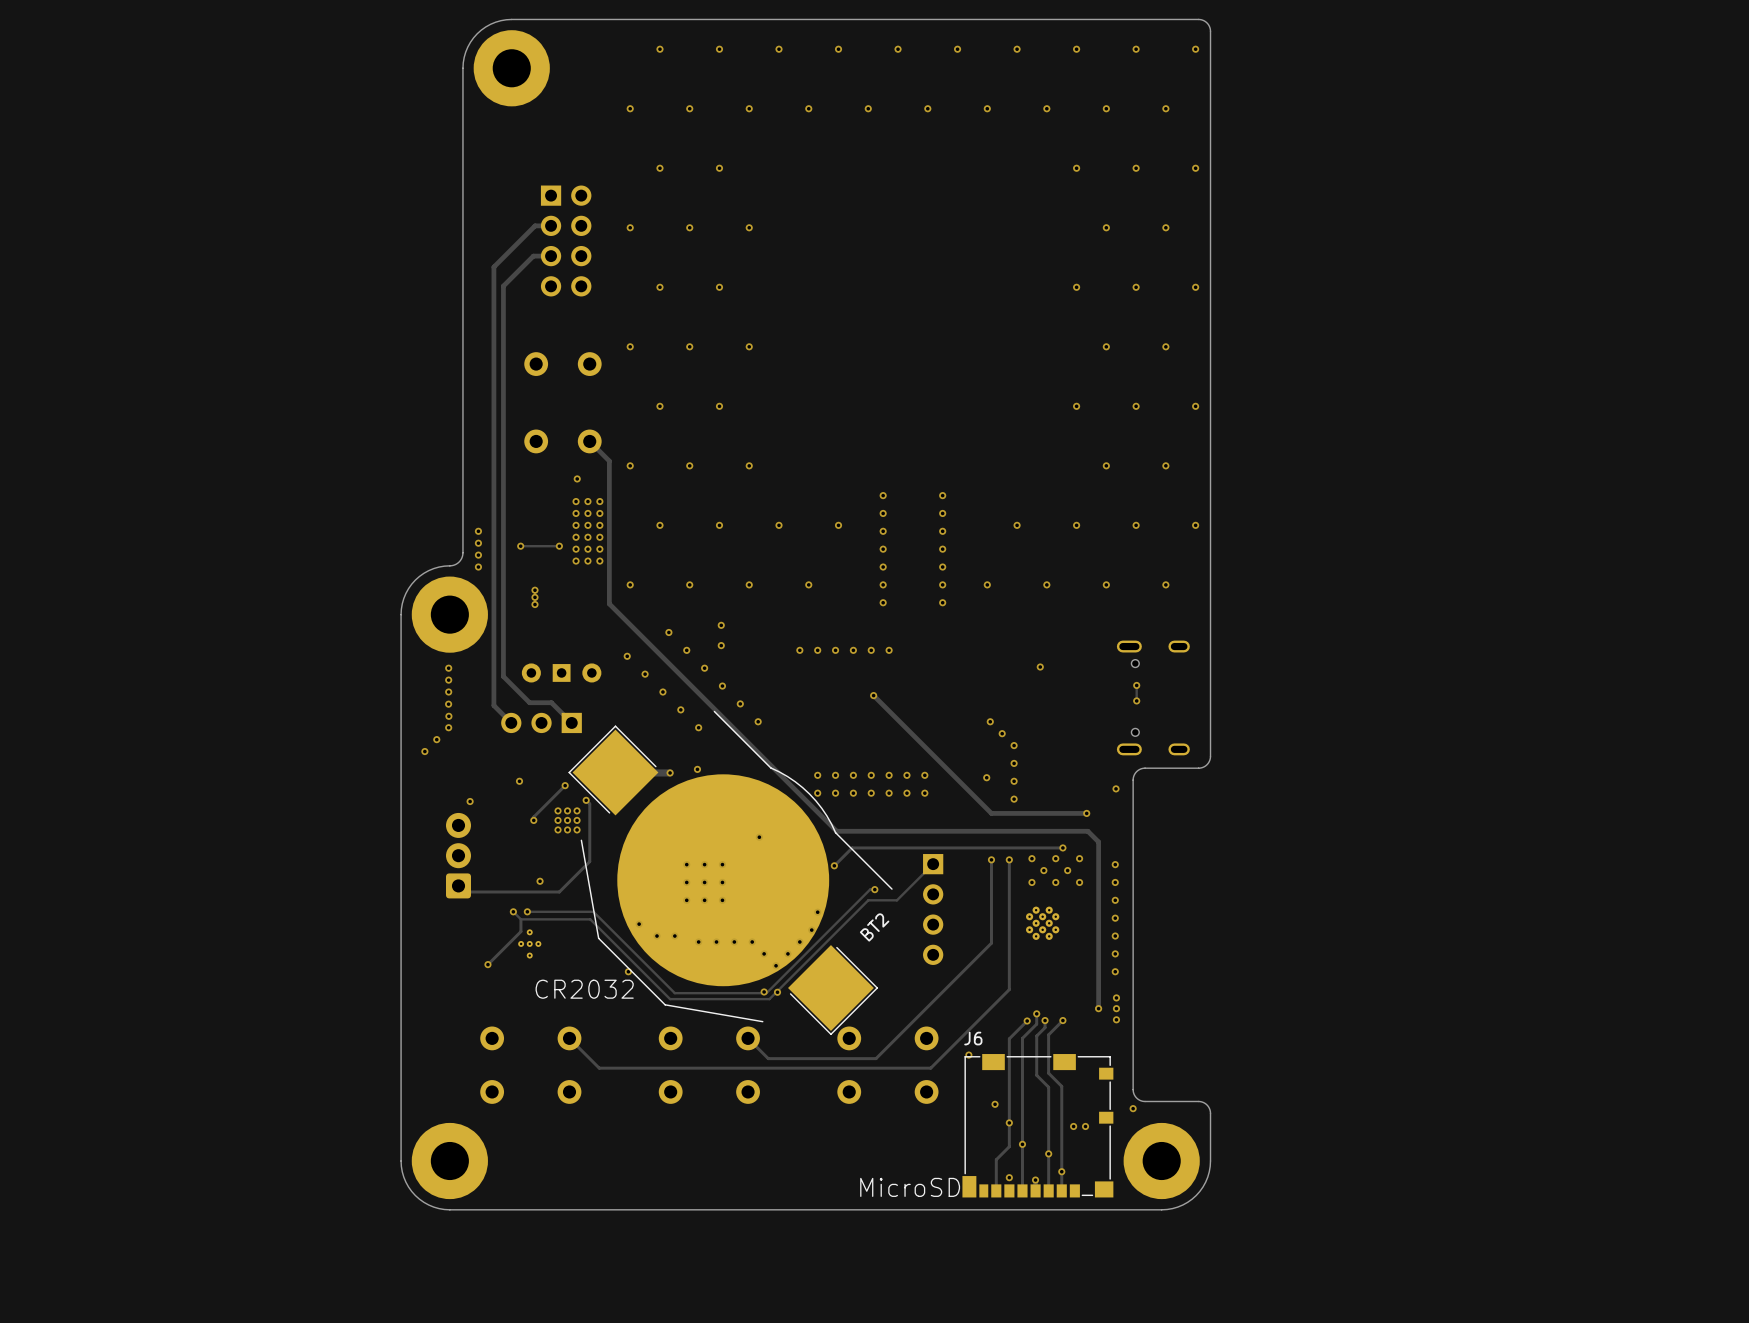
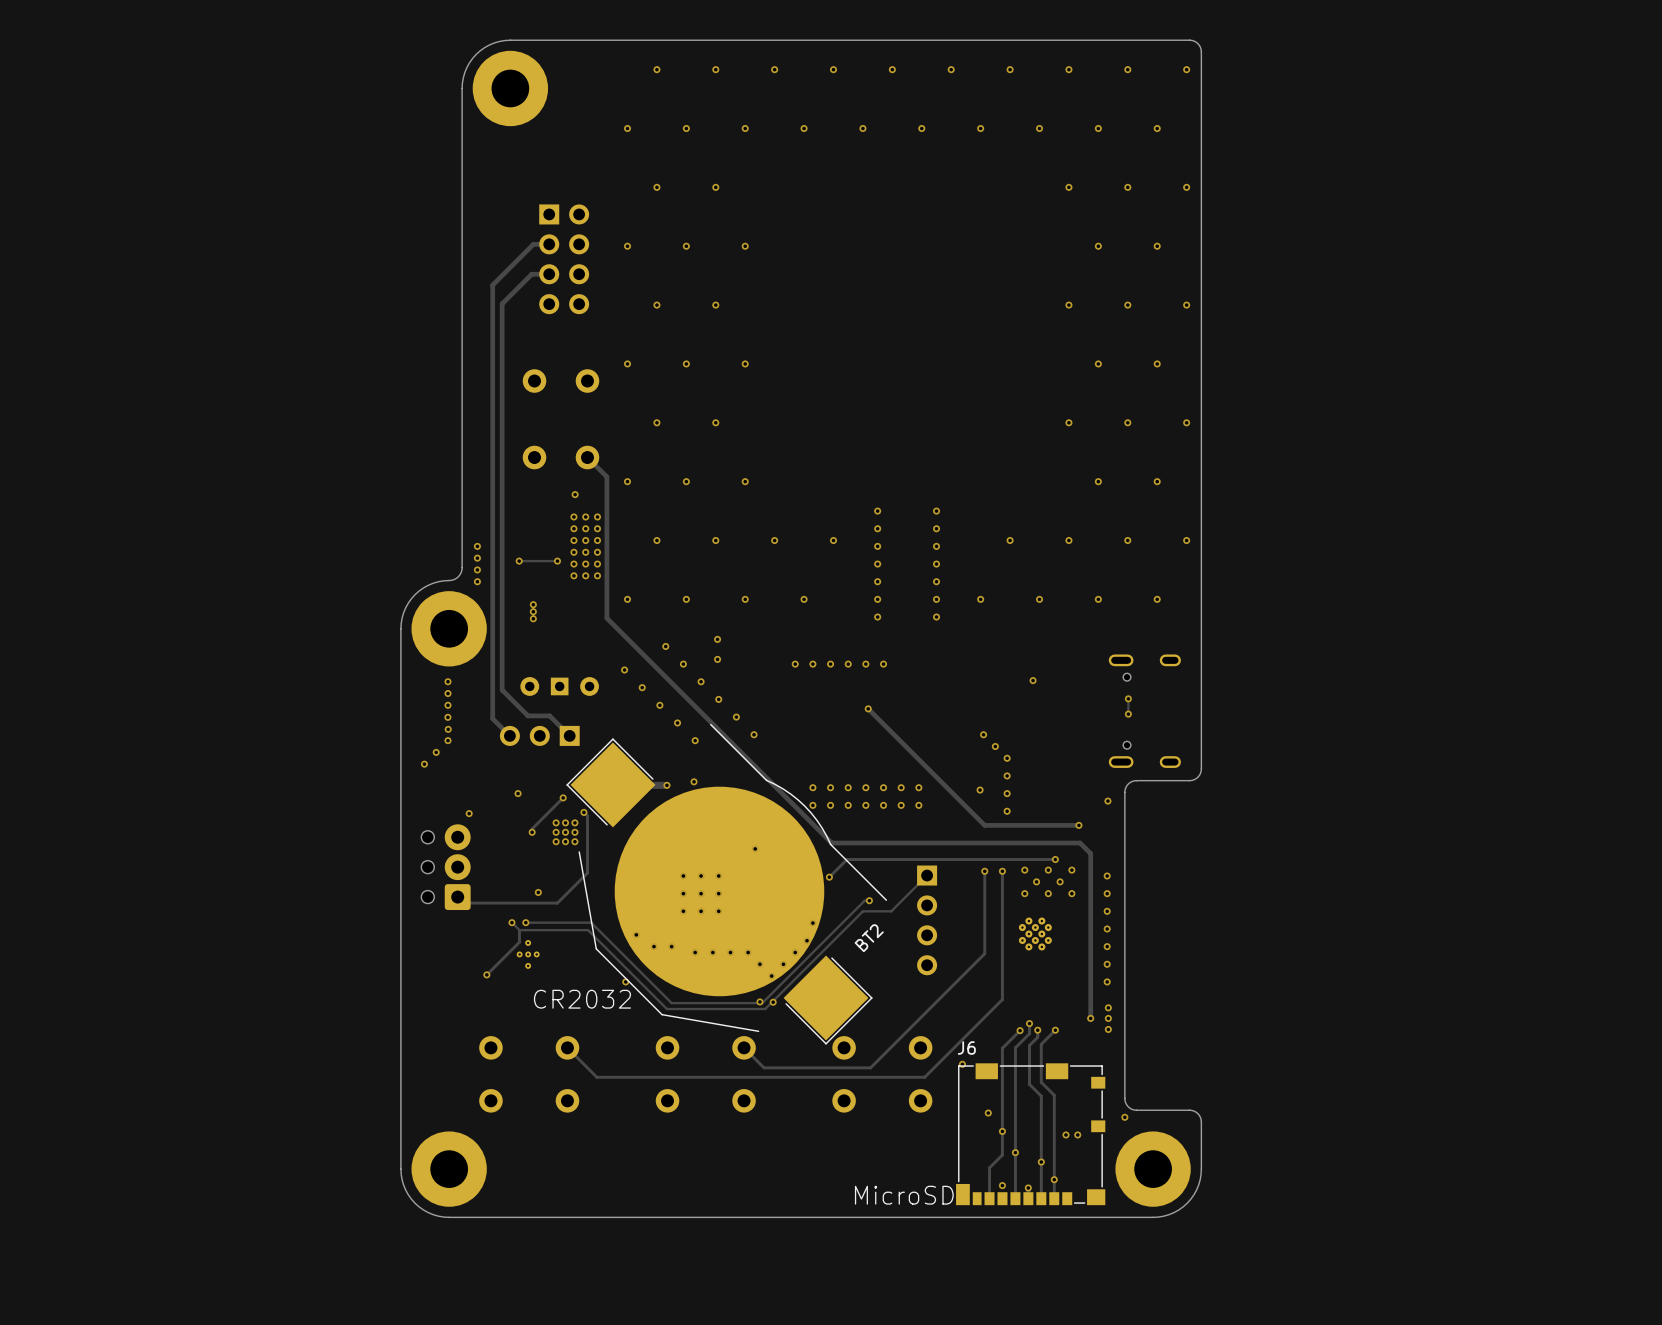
part footprint: [446, 812, 472, 899] -> [421, 824, 471, 911]

